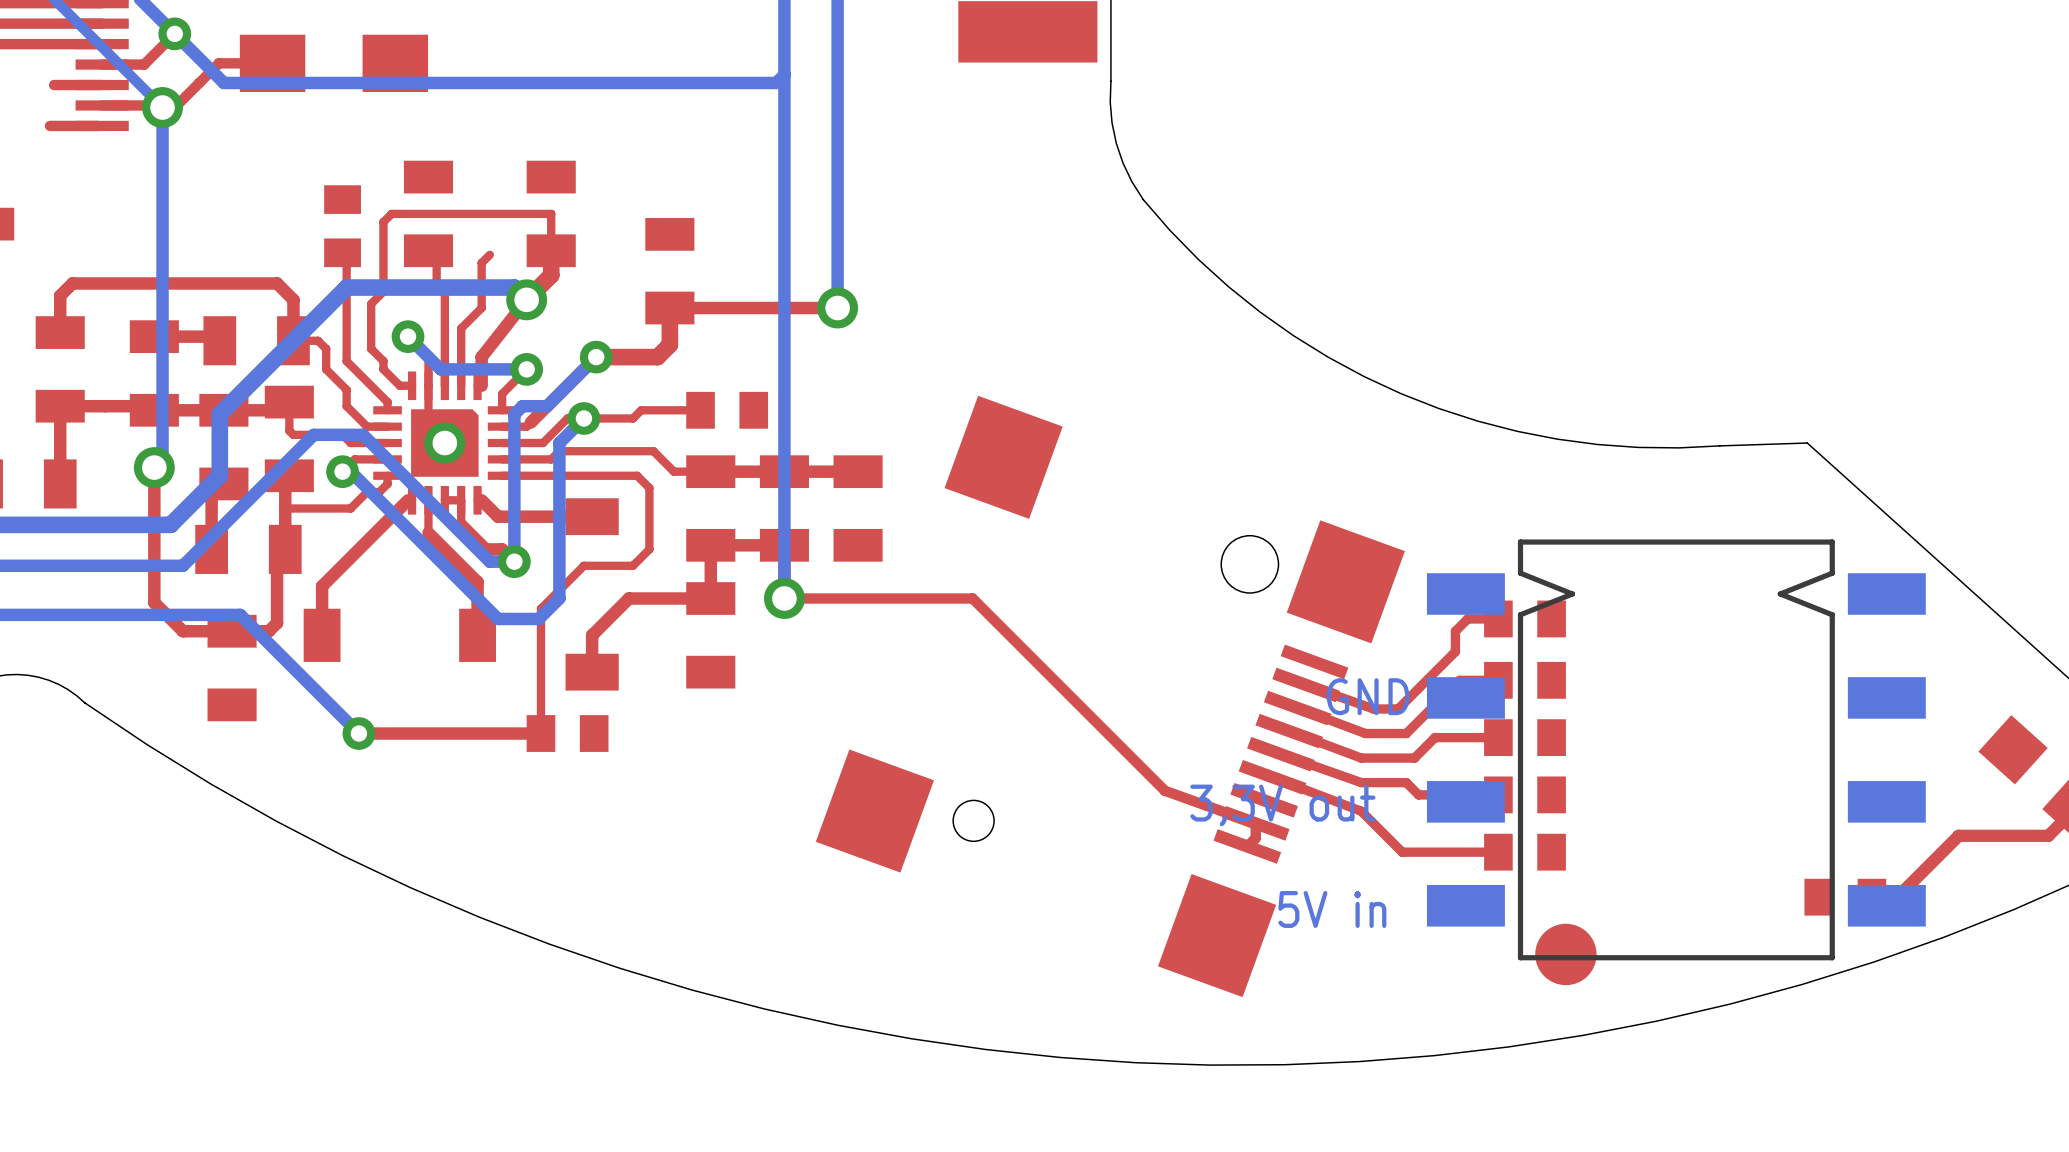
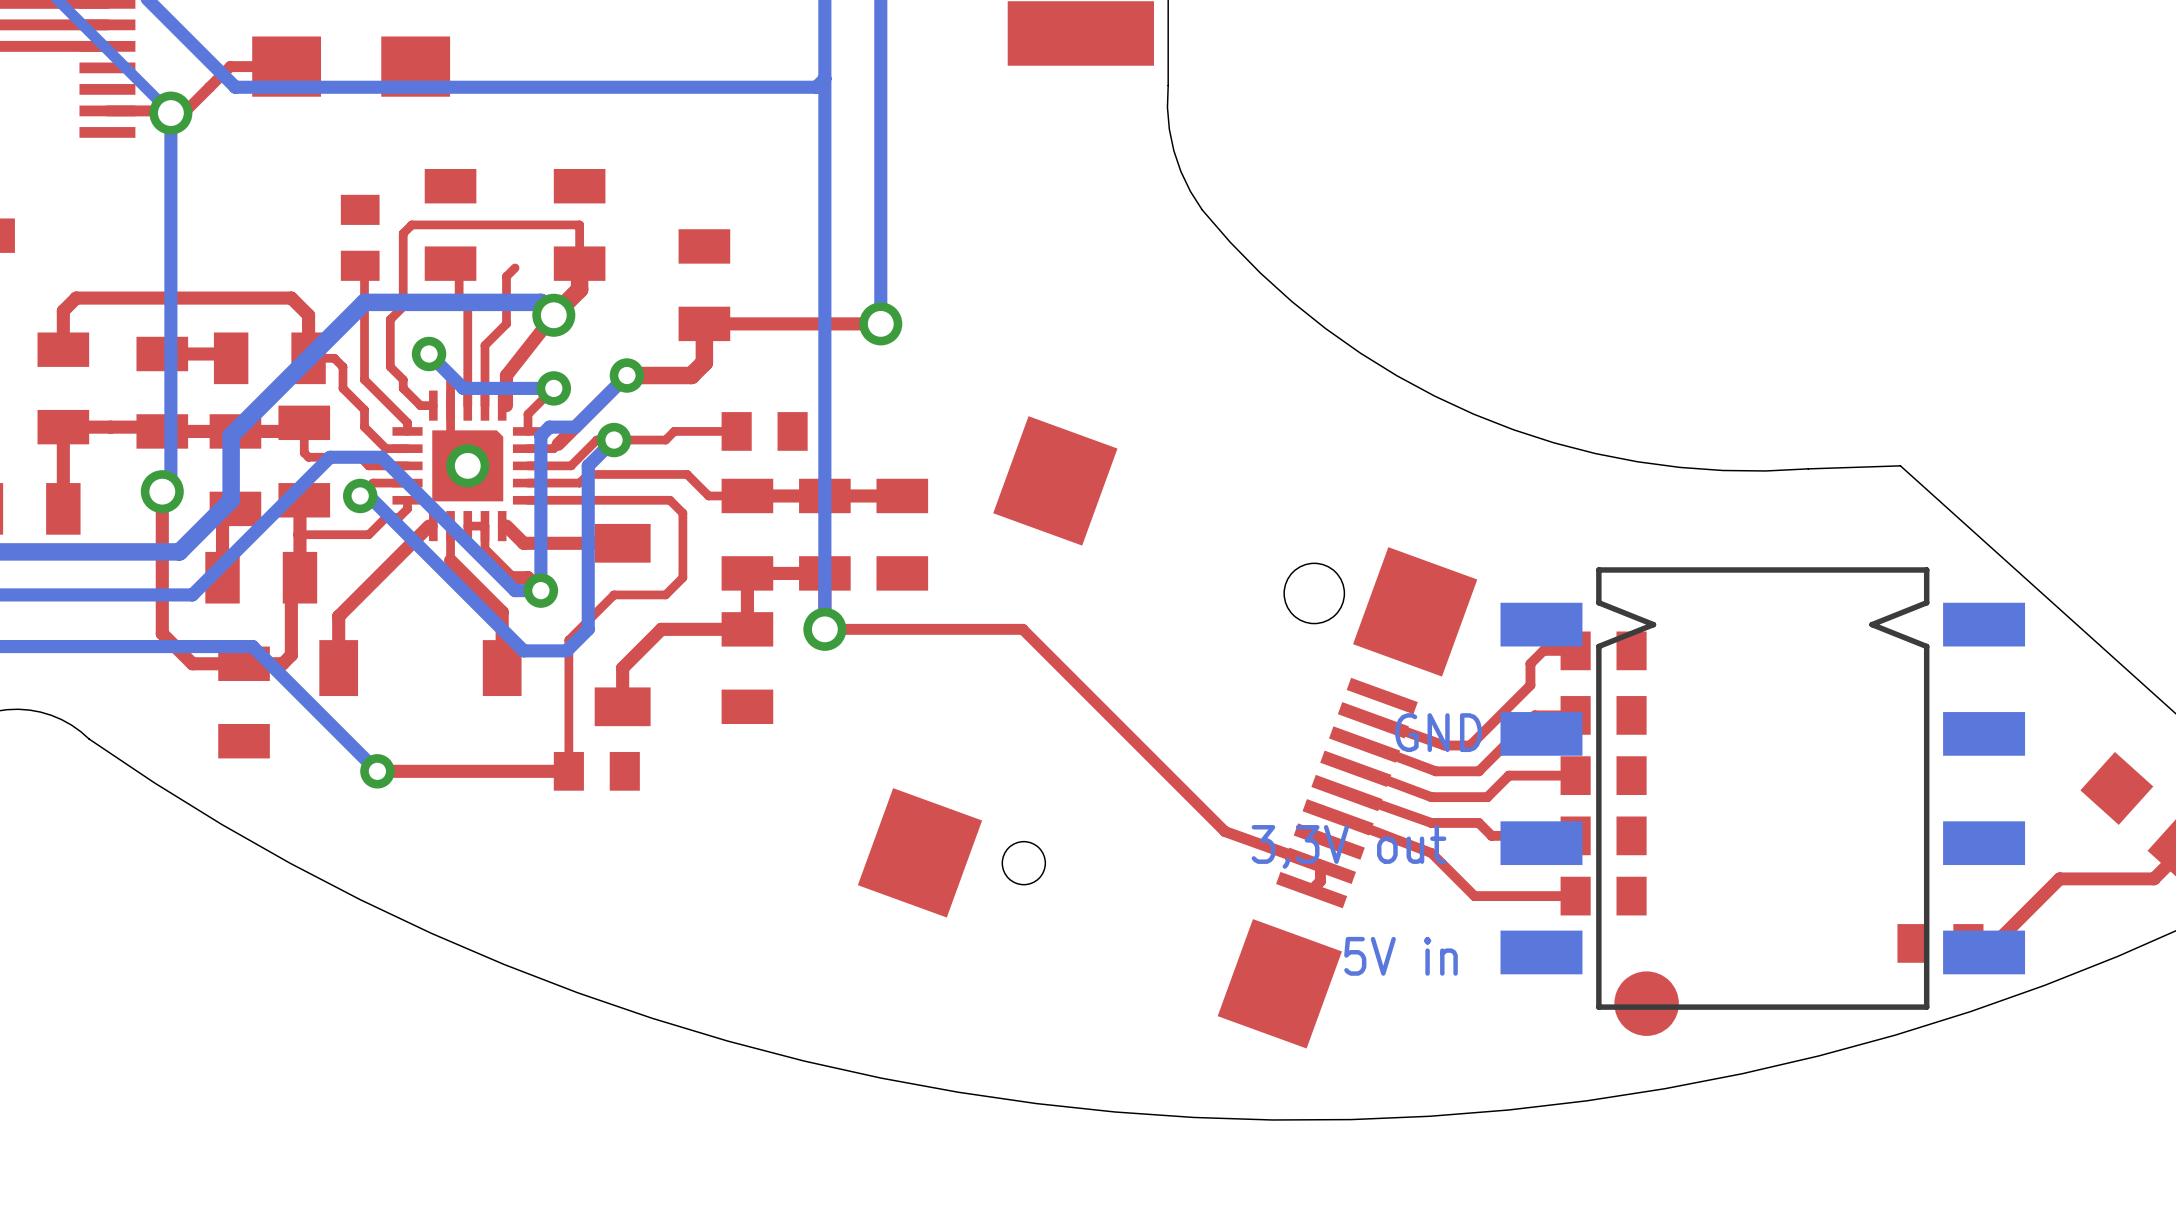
top track: (174, 33) (144, 64) (102, 64) -> none
via: (174, 33) -> none
top track: (102, 85) (54, 85) -> none
top track: (98, 125) (50, 125) -> none

